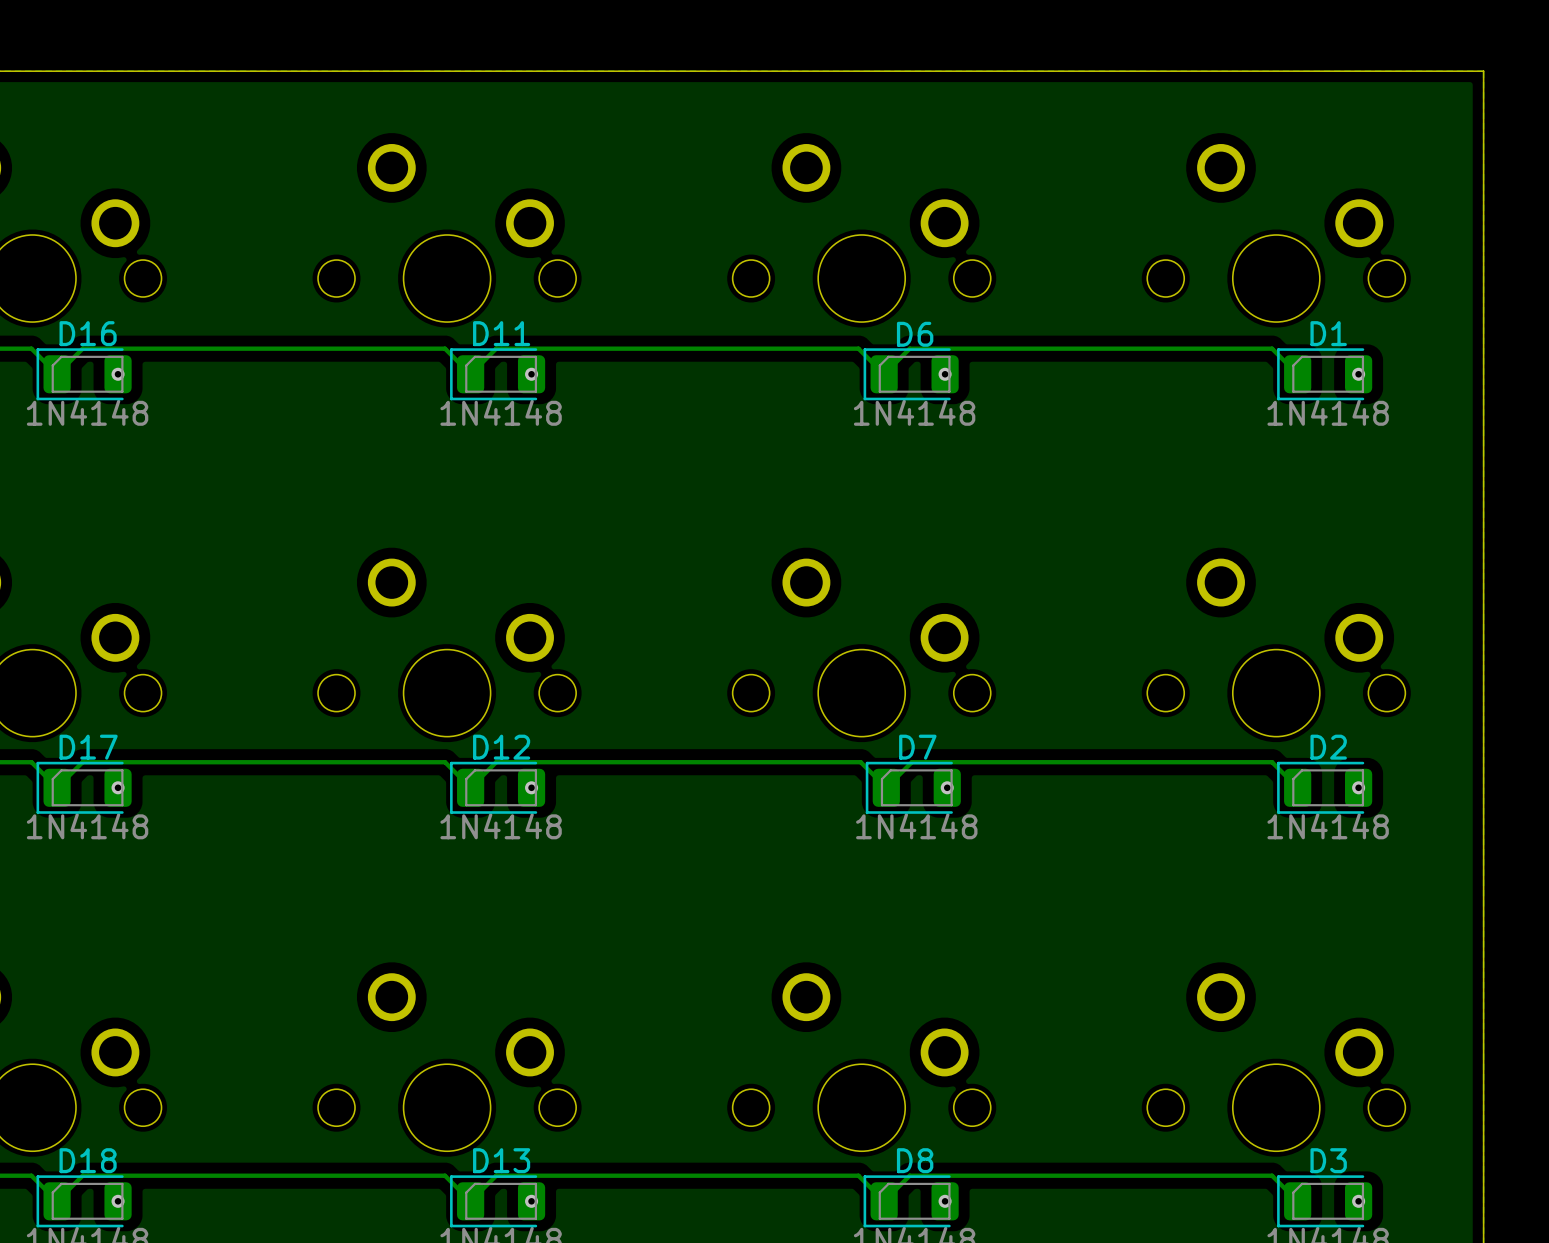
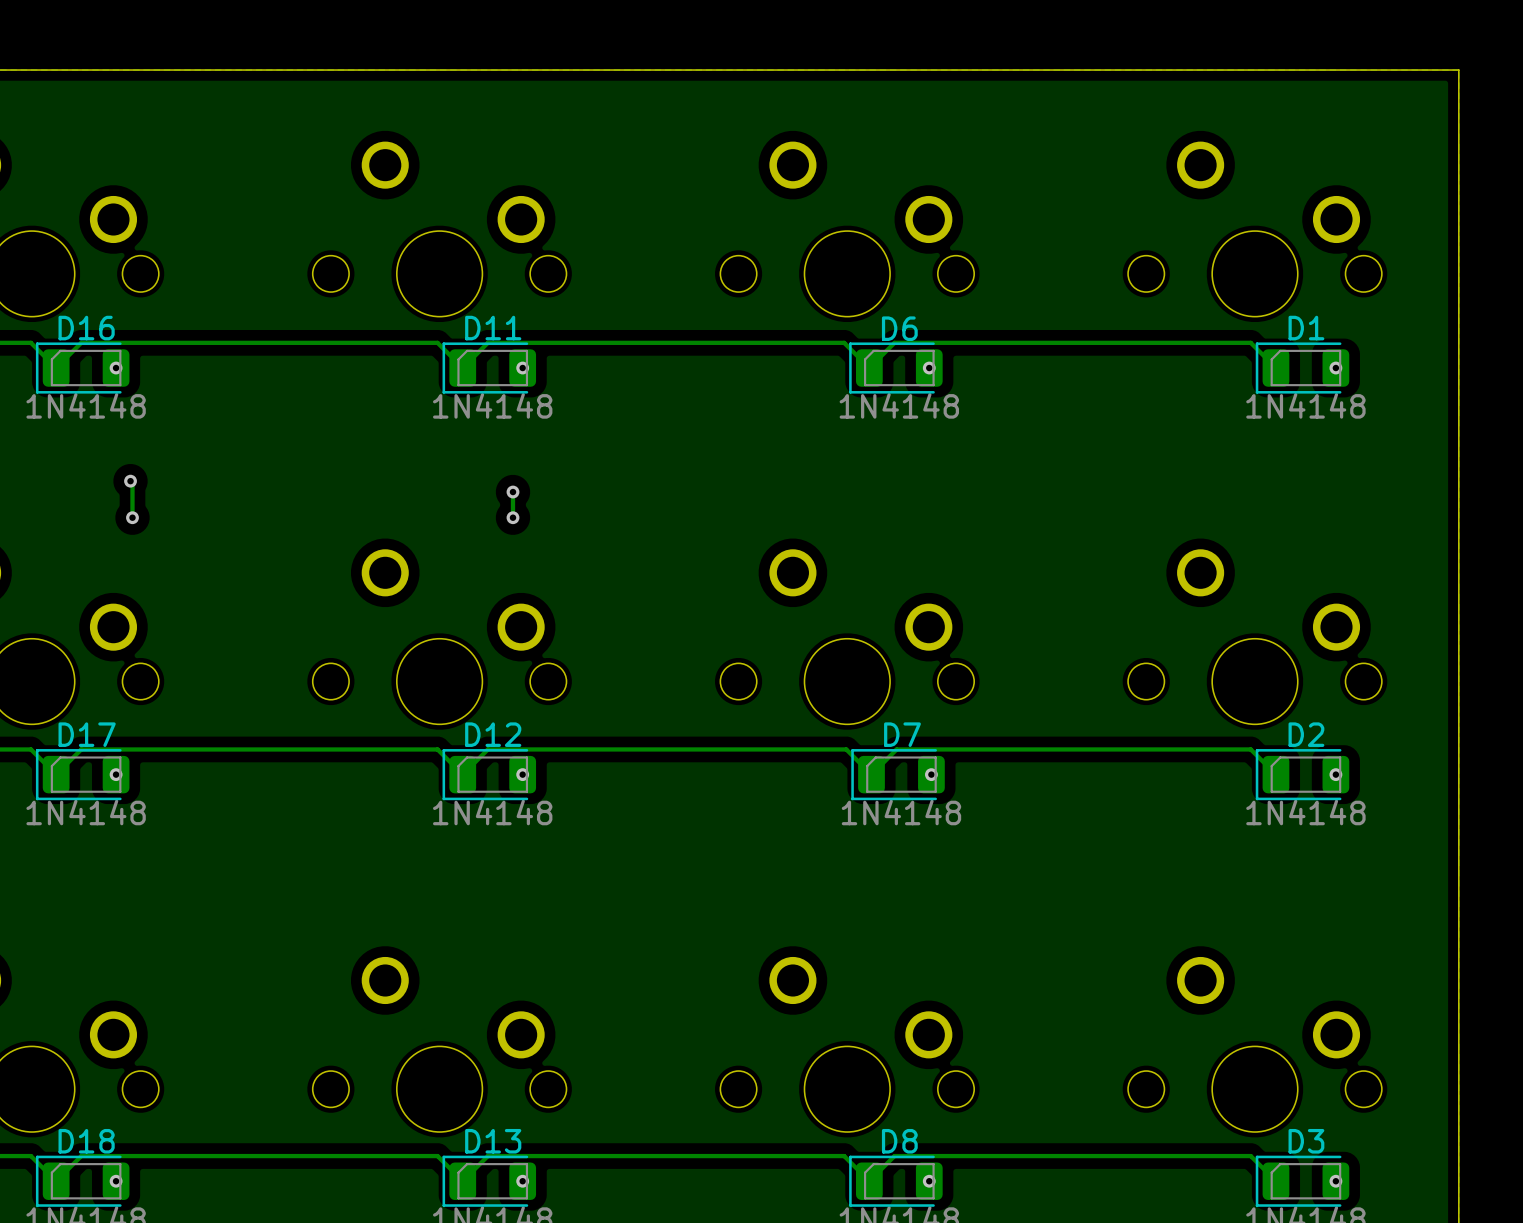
track: none -> (130, 481) (132, 483) (132, 517)
via: none -> (130, 481)
track: none -> (512, 492) (512, 517)
via: none -> (512, 492)
via: none -> (132, 517)
via: none -> (512, 517)

